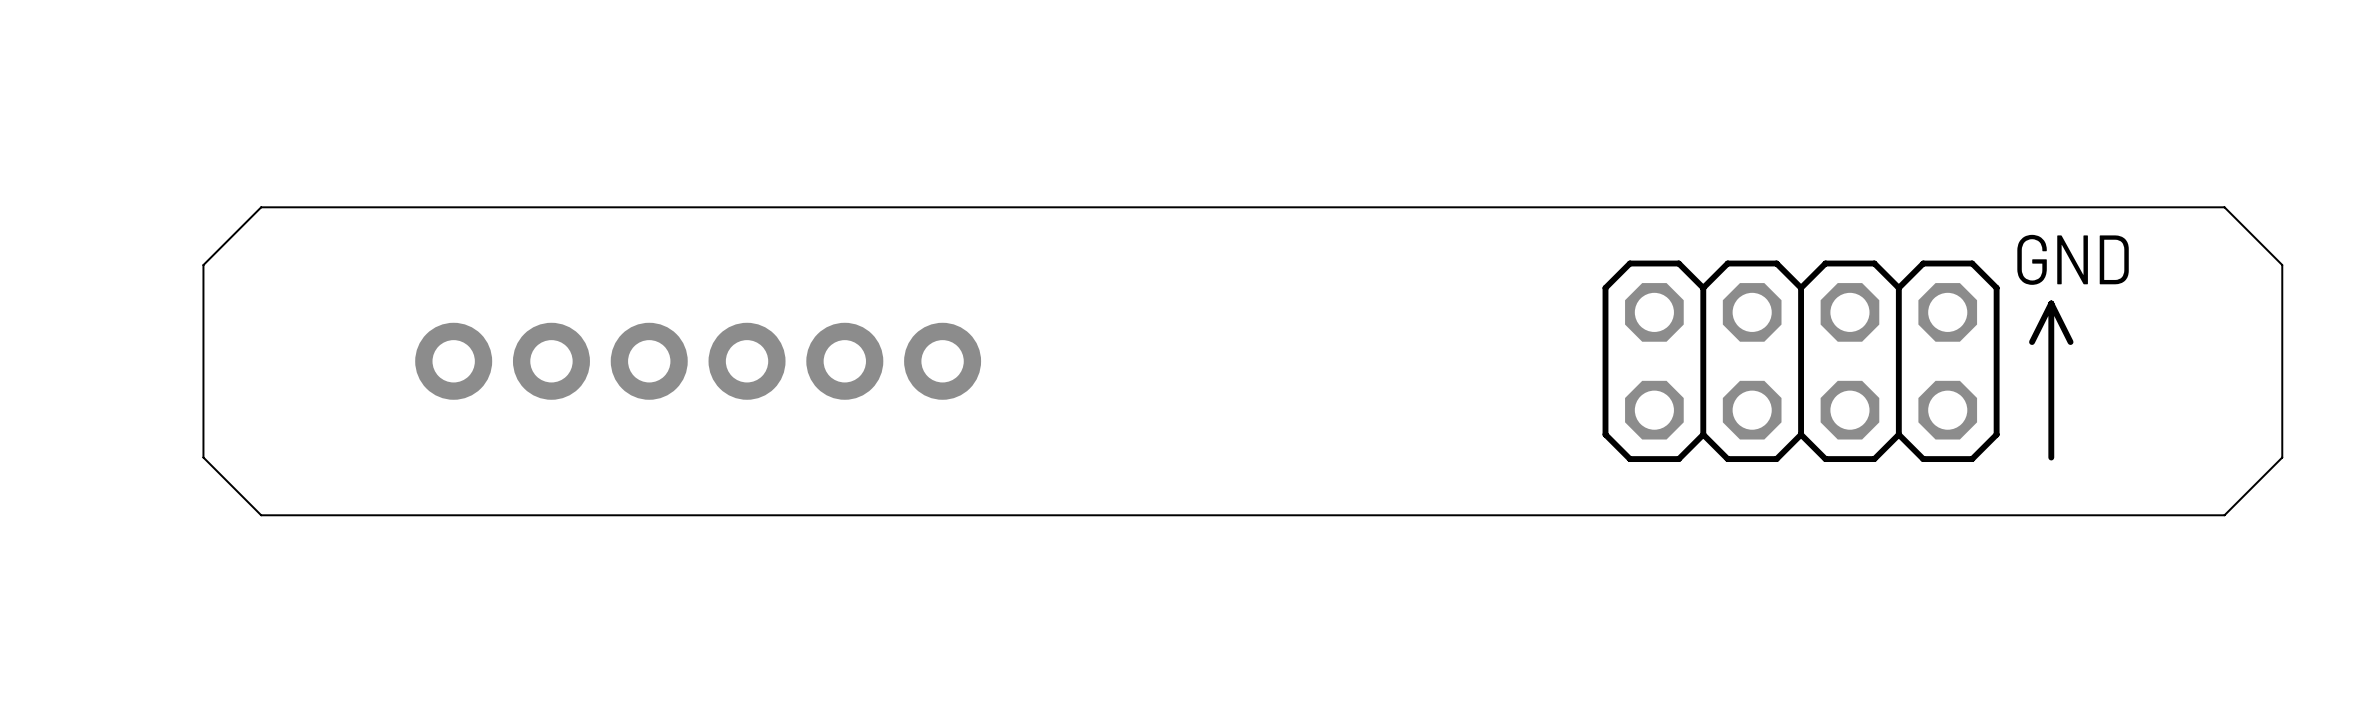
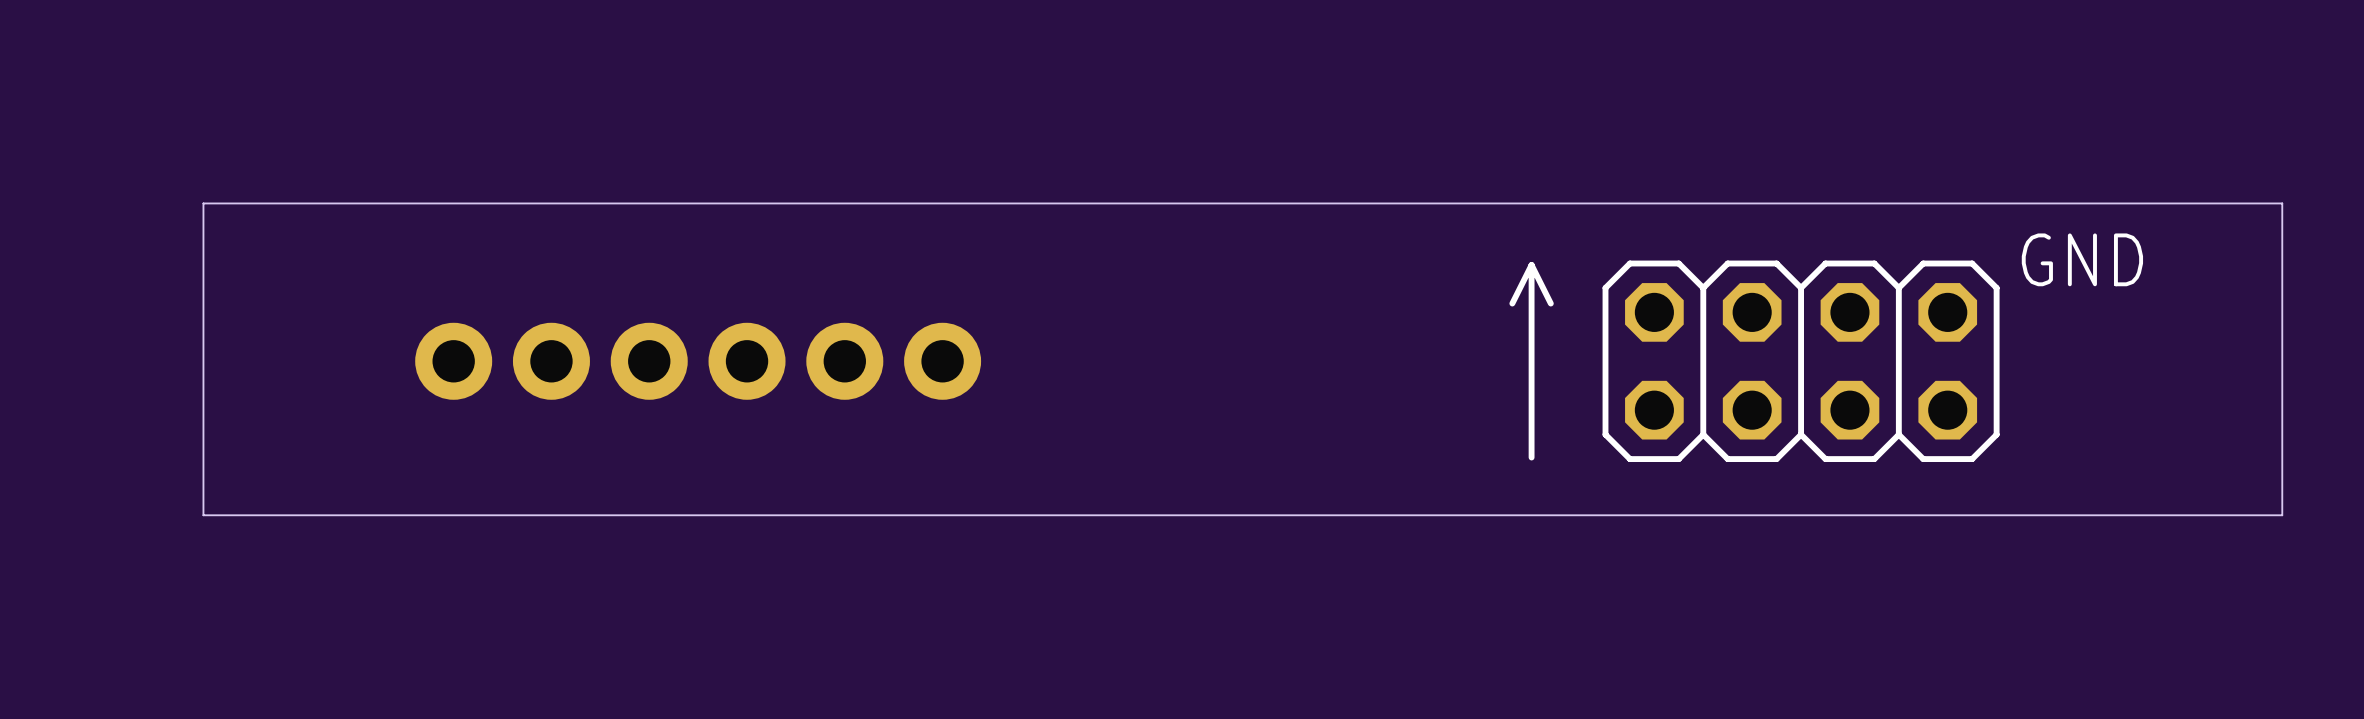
board edge: (203, 265) (261, 207) (2224, 207) (2282, 265) -> (203, 265) (203, 203) (2282, 203) (2282, 265)
line: none -> (1531, 265) (1531, 457)
line: (2051, 303) (2070, 342) -> (1531, 265) (1550, 303)
line: (2051, 303) (2032, 342) -> (1531, 265) (1512, 303)
line: (2051, 303) (2051, 457) -> none
board edge: (203, 457) (261, 515) -> (203, 457) (203, 515) (261, 515)
board edge: (2282, 457) (2224, 515) -> (2282, 457) (2282, 515) (2224, 515)

